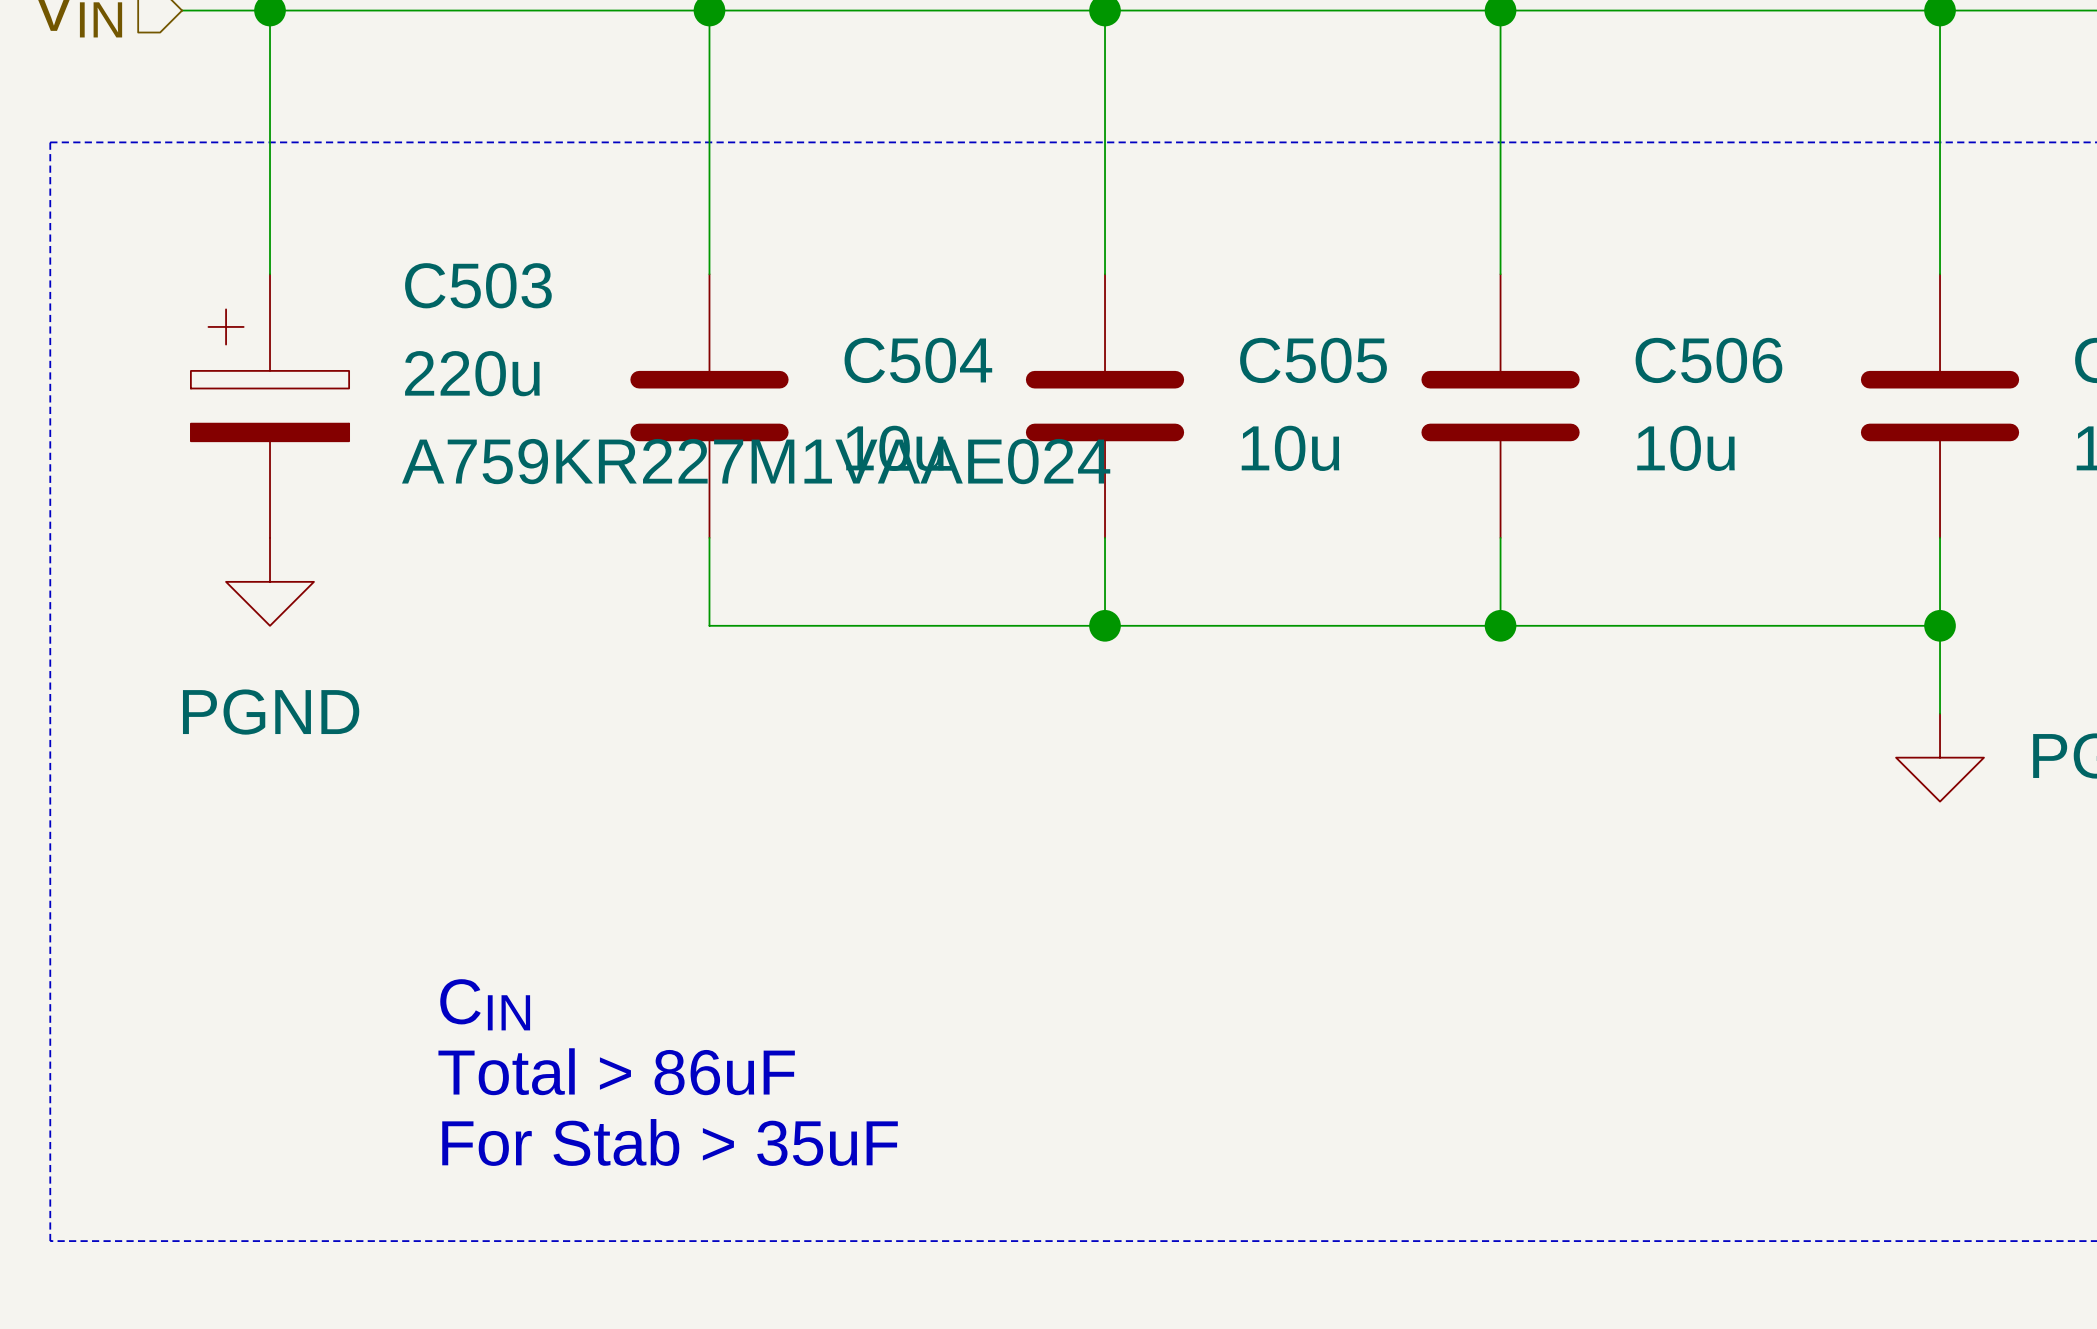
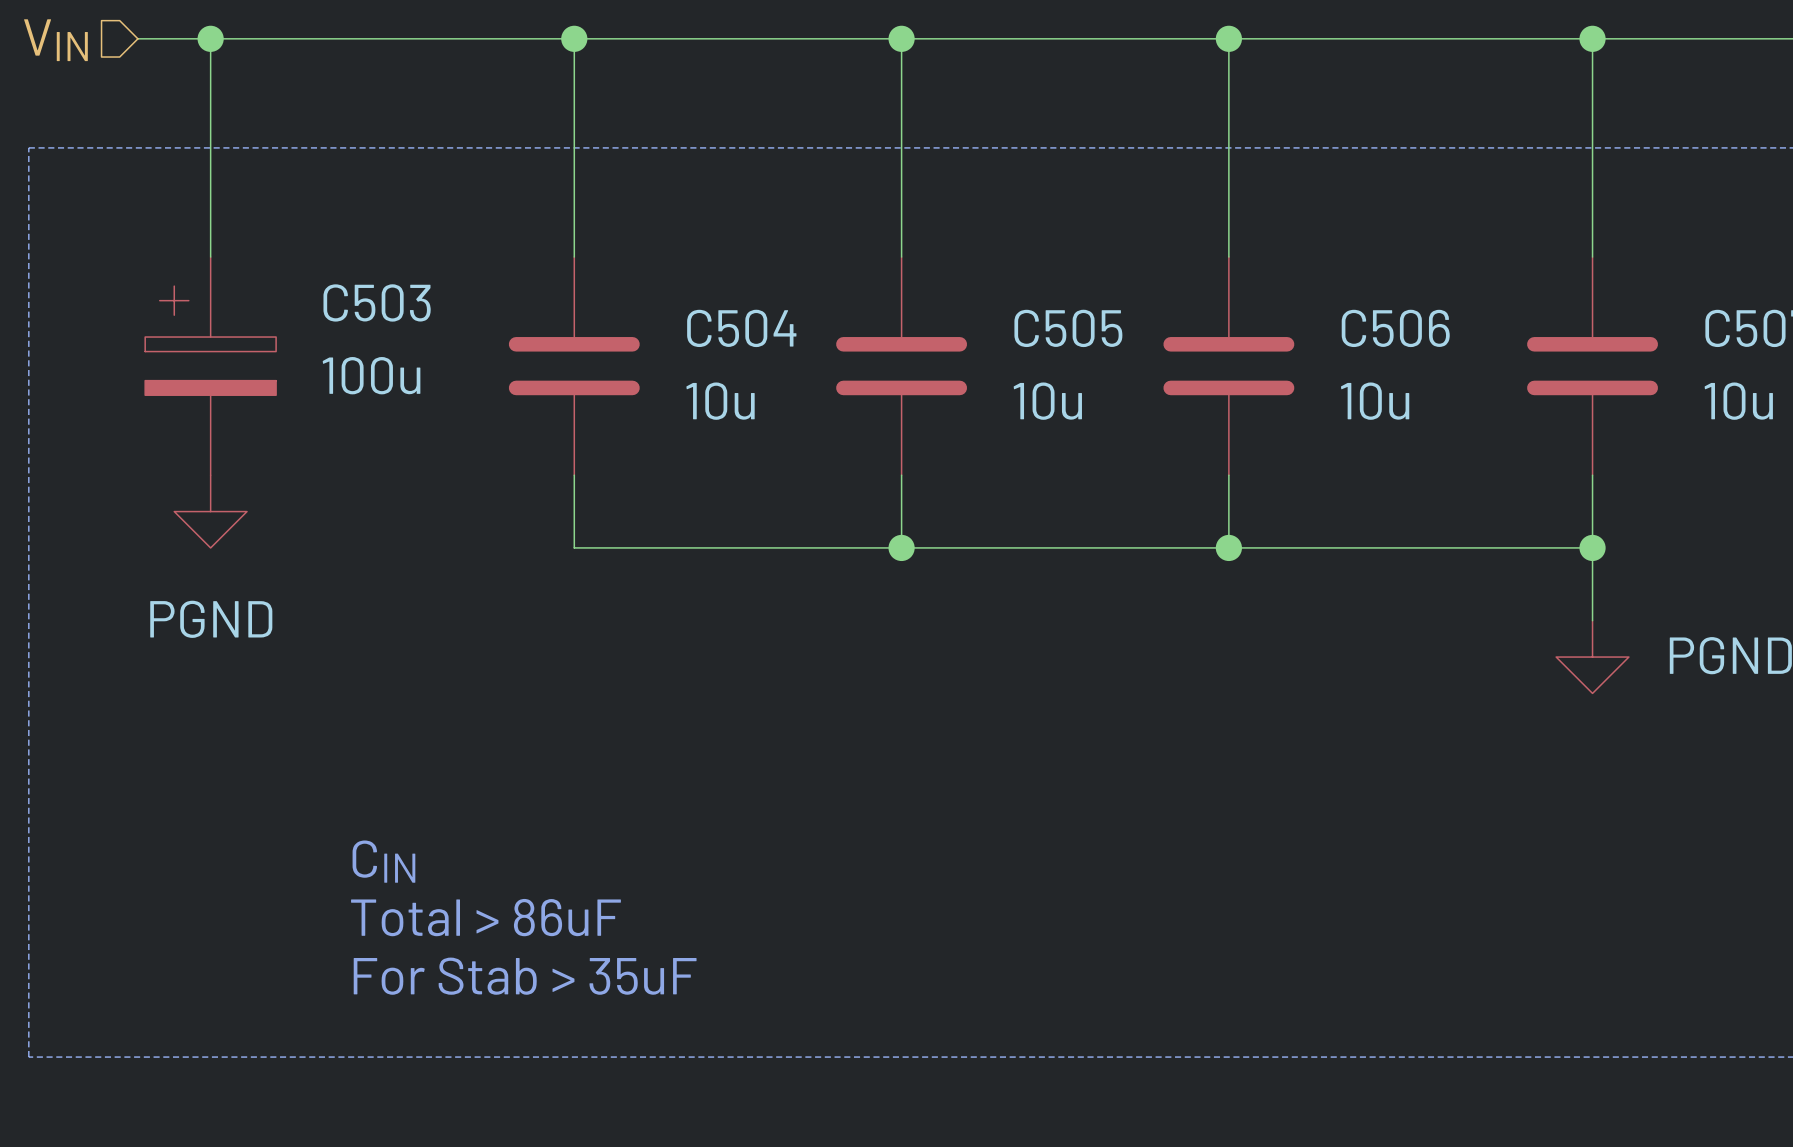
C503 name position: C503 (478, 285) -> C503 (377, 302)
C503 value: 220u (472, 373) -> 100u (371, 375)
C503 text: A759KR227M1VAAE024 (756, 461) -> none

